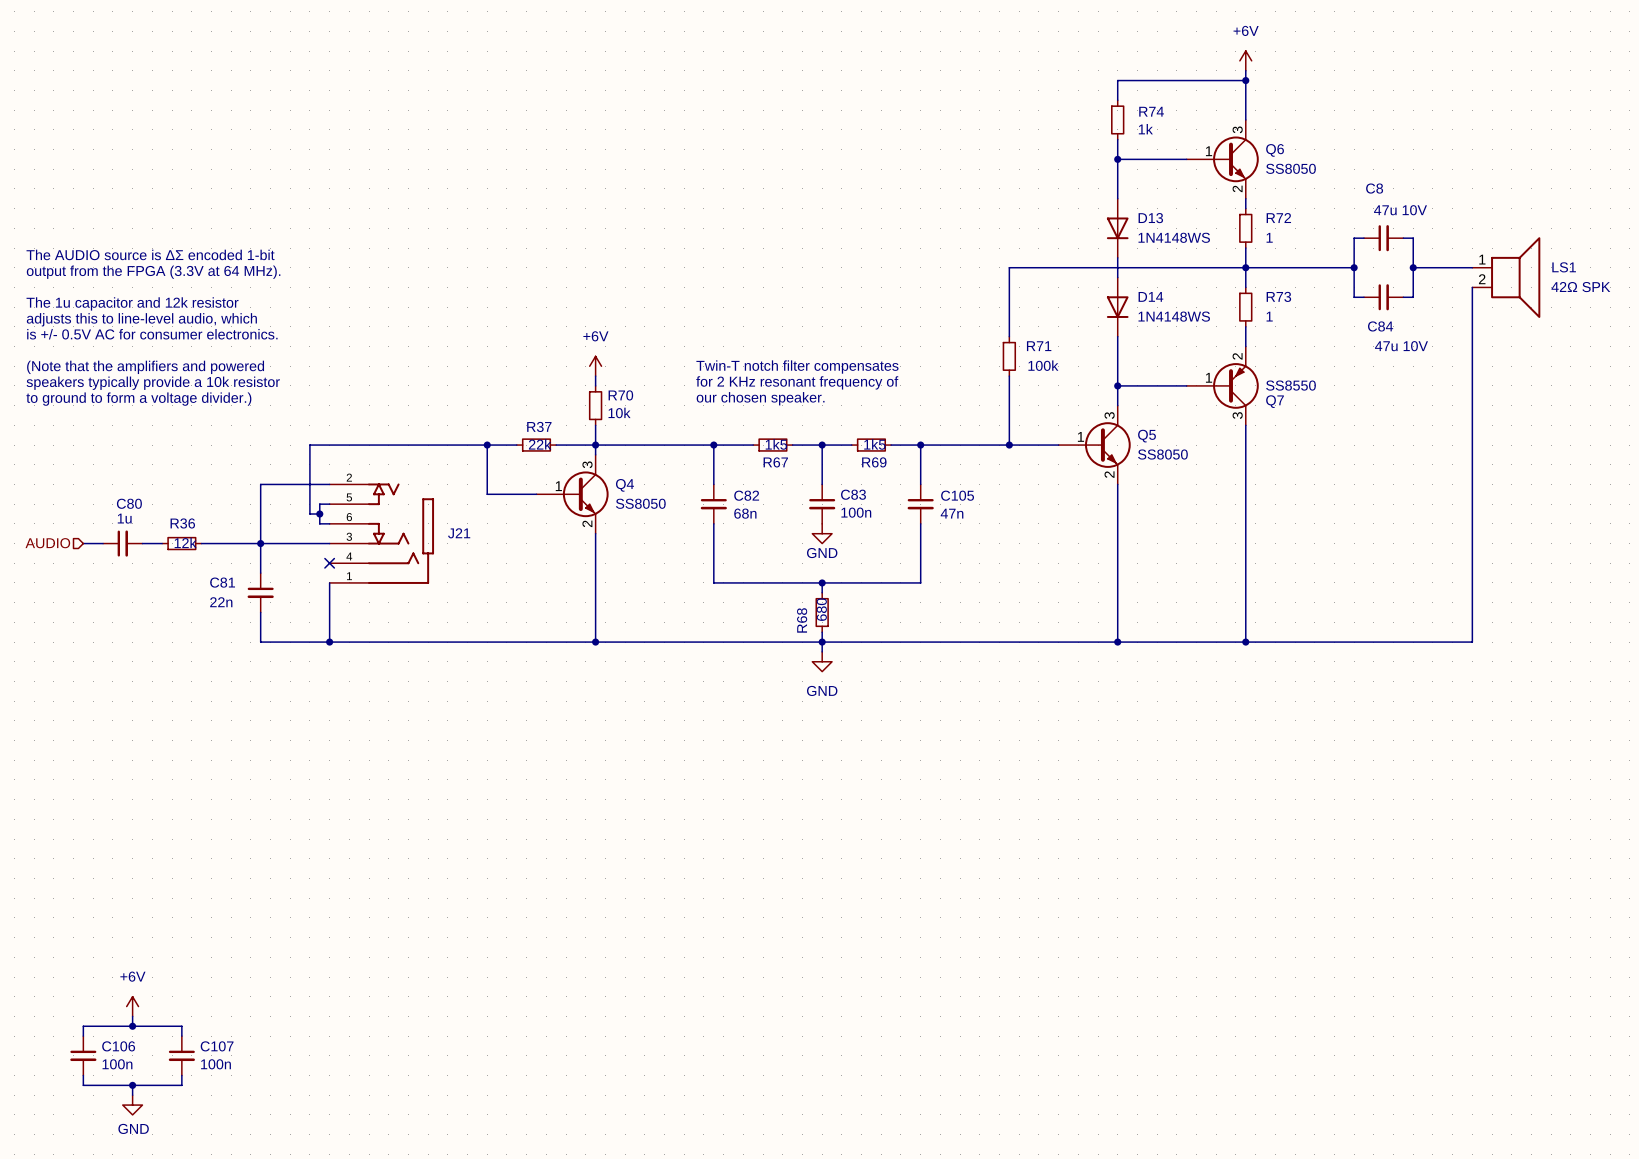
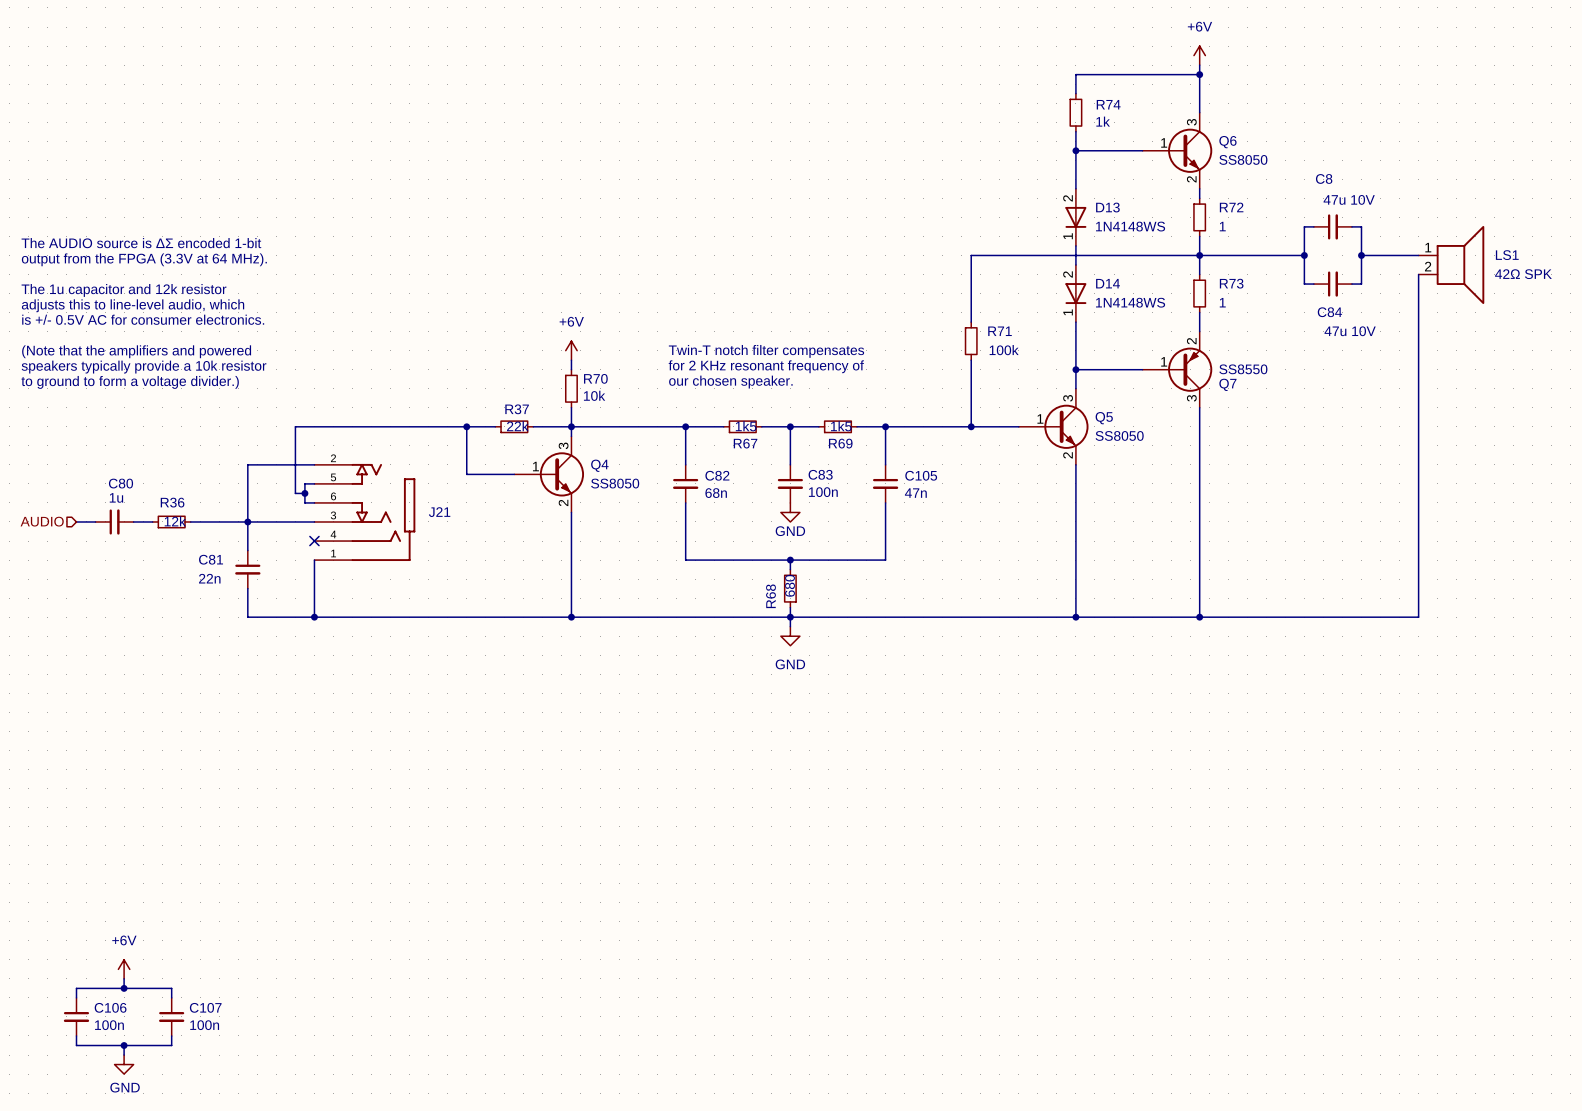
D13 pin number: none -> 2 (1068, 198)
D13 pin number: none -> 1 (1068, 236)
D14 pin number: none -> 2 (1068, 274)
D14 pin number: none -> 1 (1068, 312)

